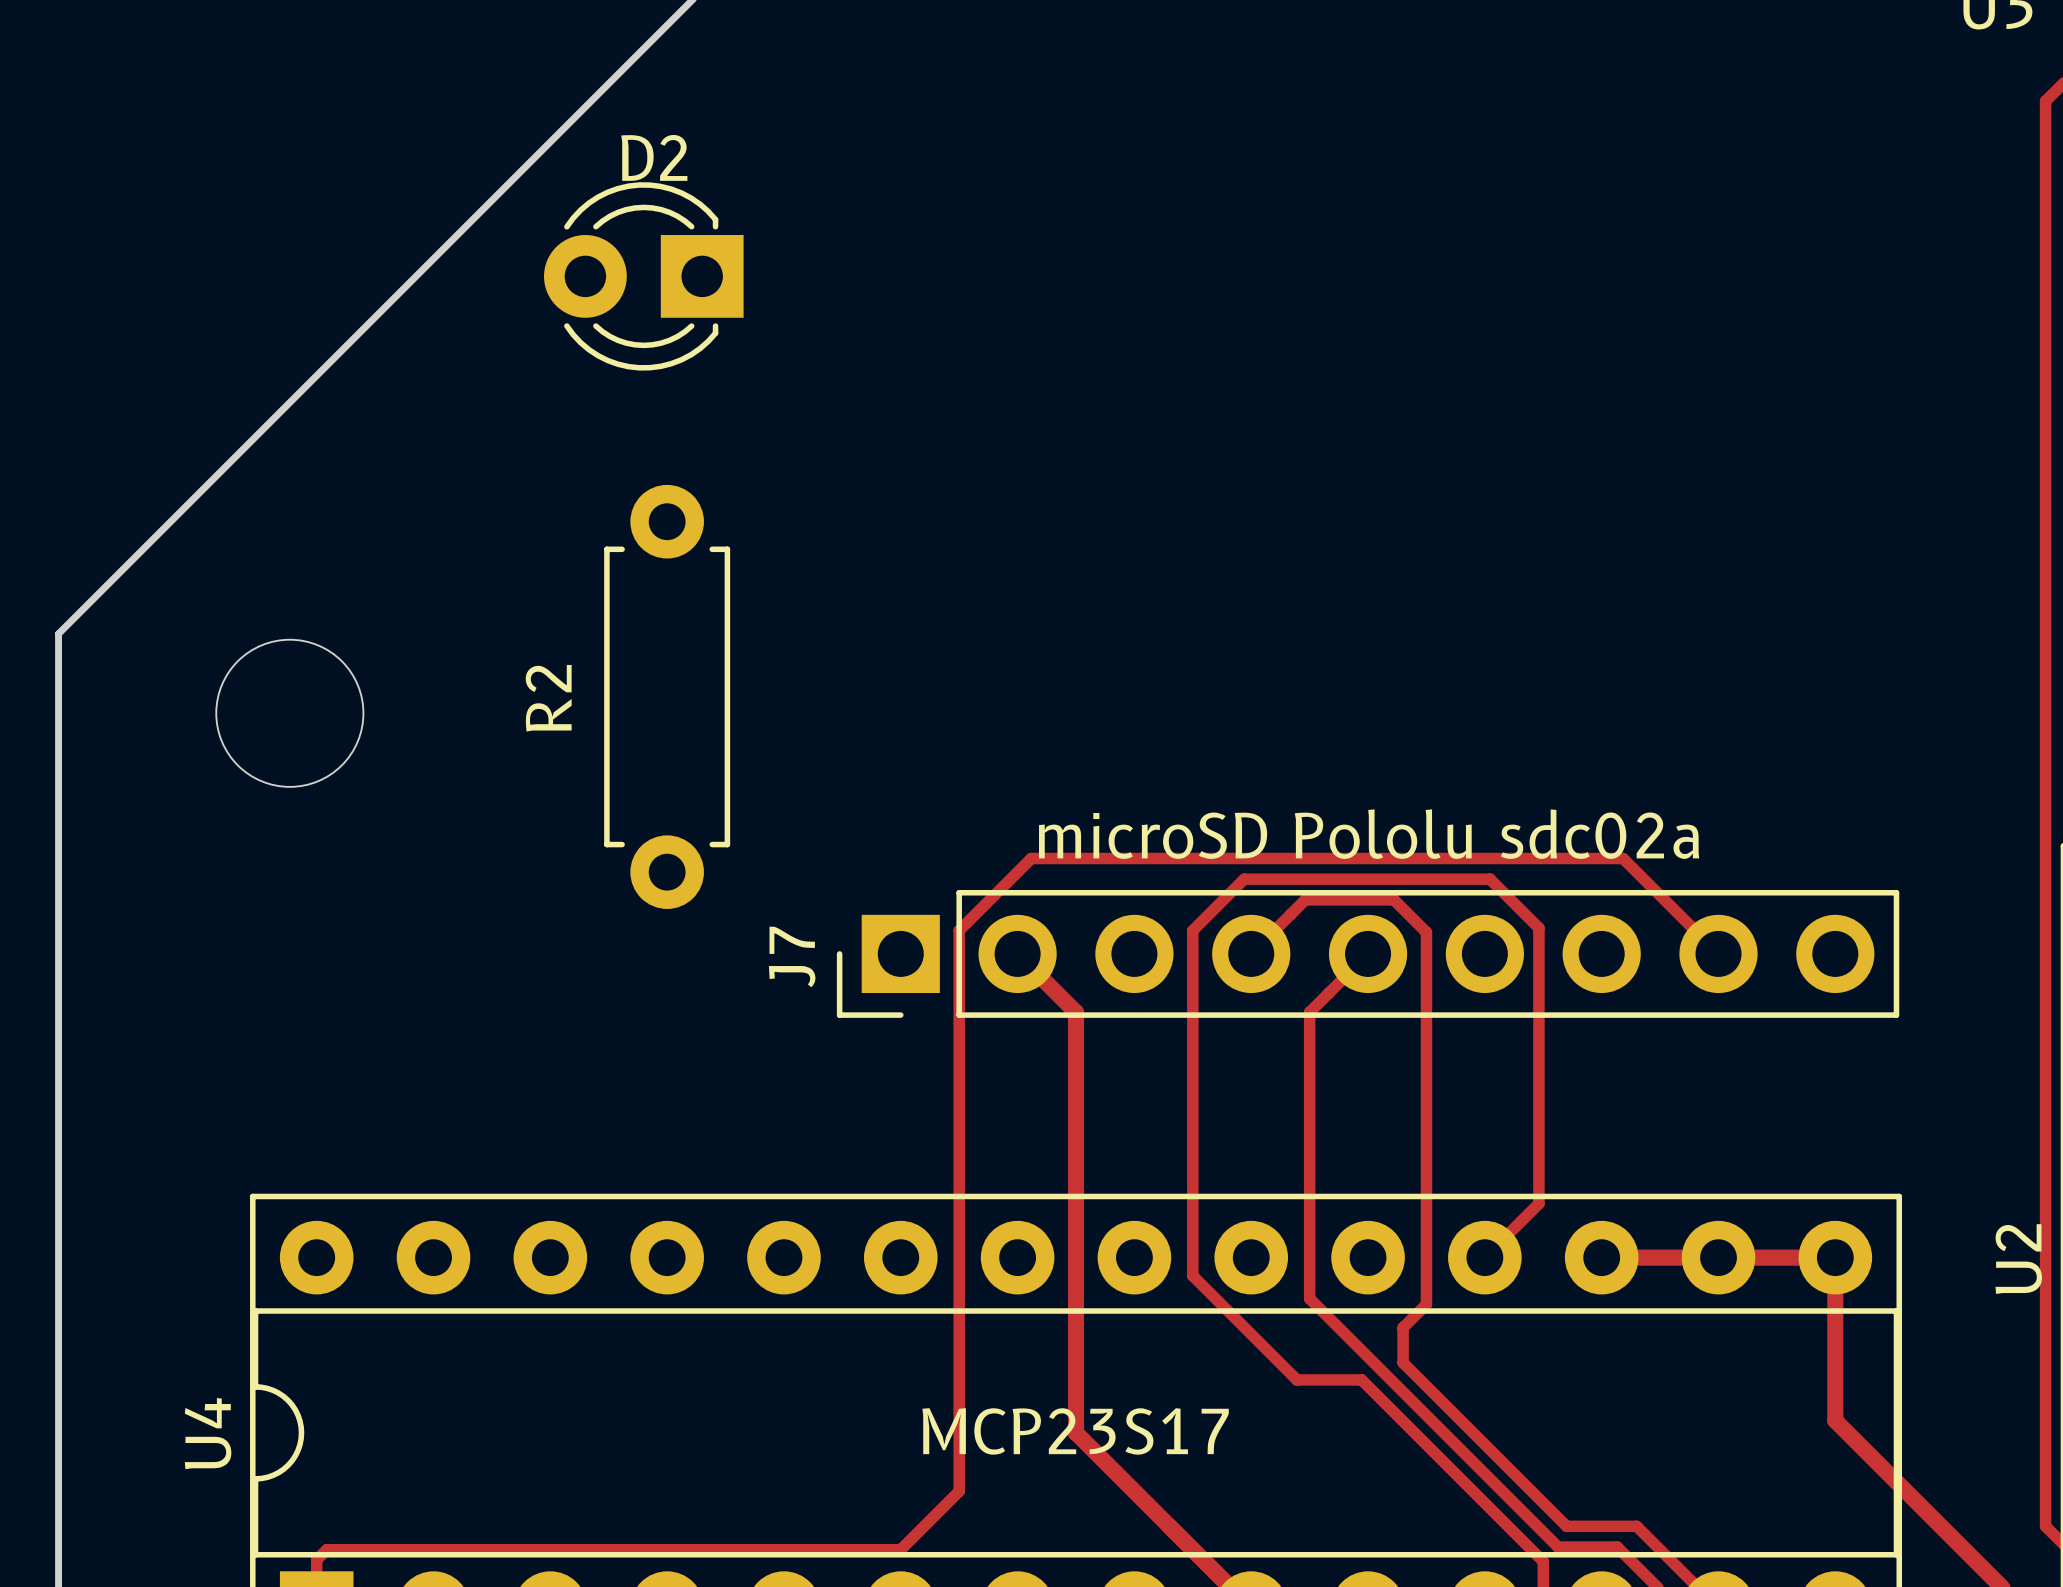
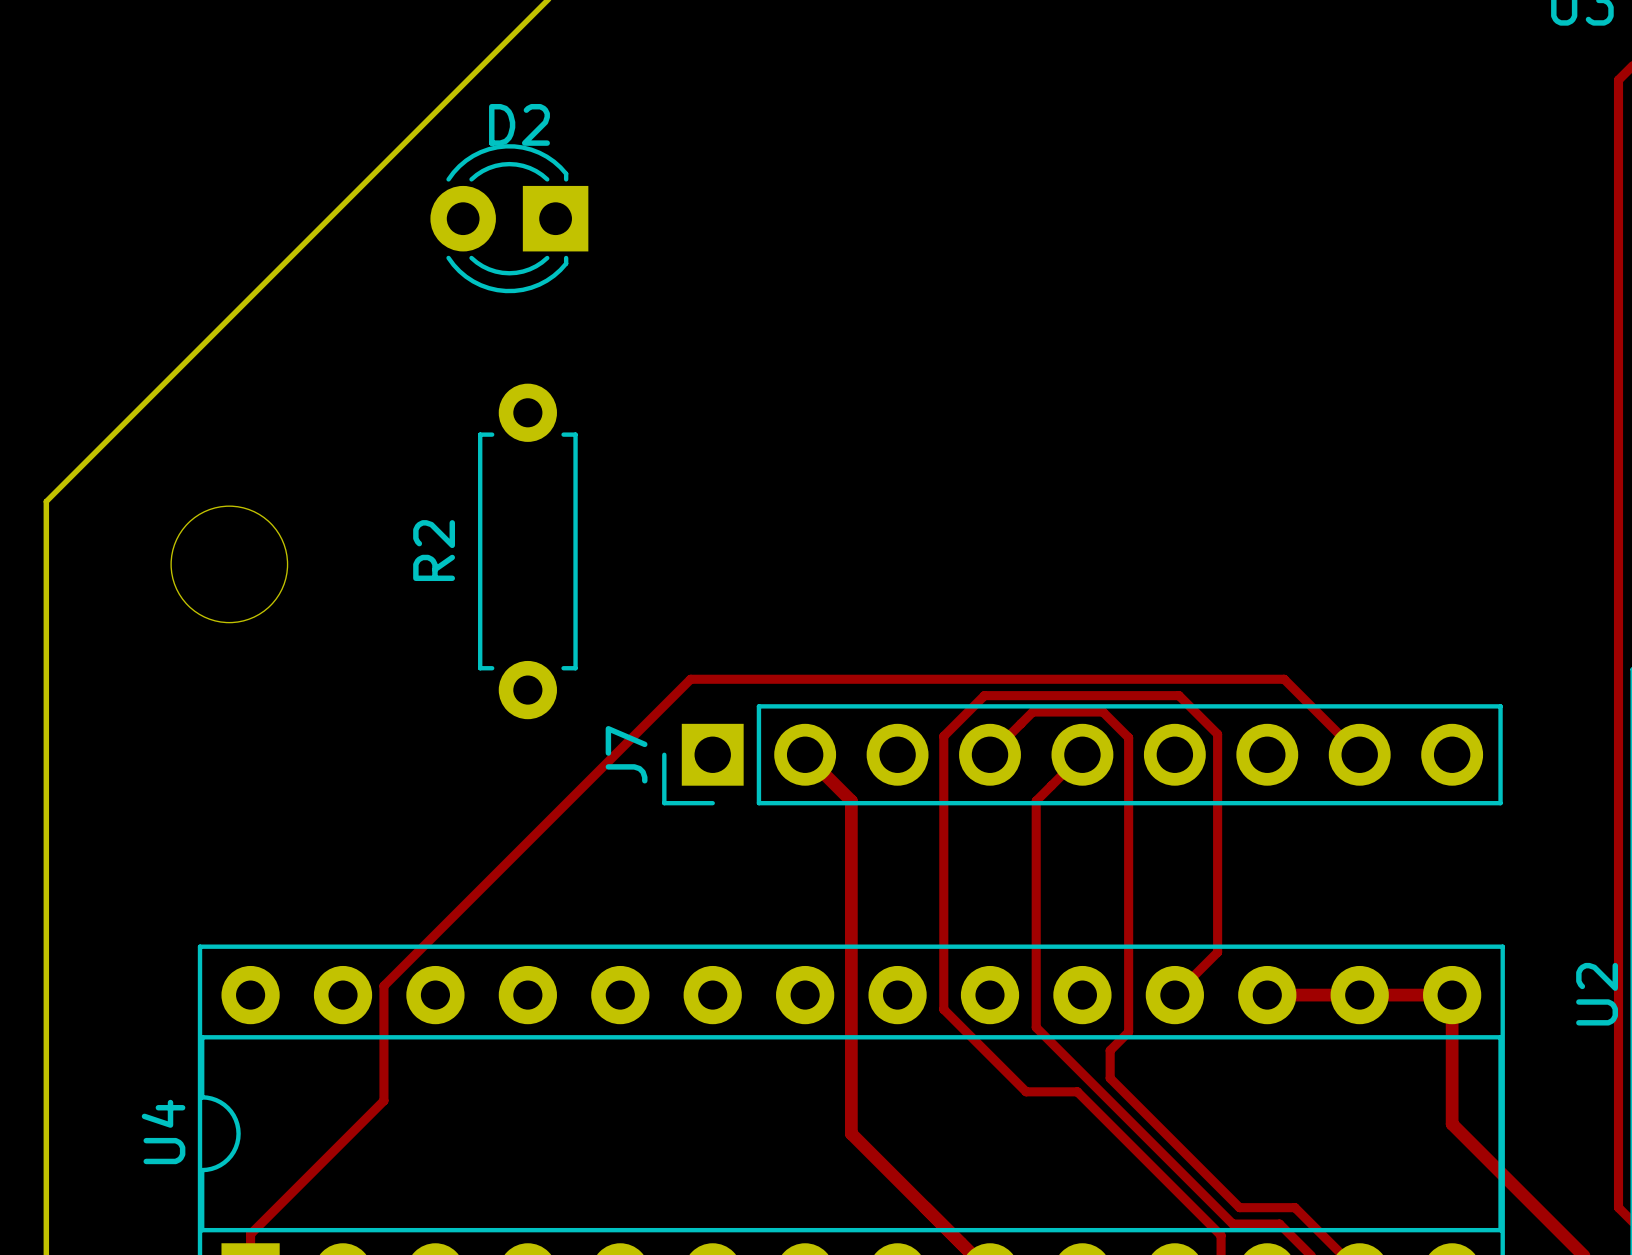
text: microSD Pololu sdc02a (1369, 834) -> none
track: (1031, 858) (959, 930) (959, 1491) (900, 1549) (326, 1549) -> (815, 679) (690, 679) (383, 985) (383, 1100) (258, 1226)
U4 value: MCP23S17 (1075, 1431) -> none

